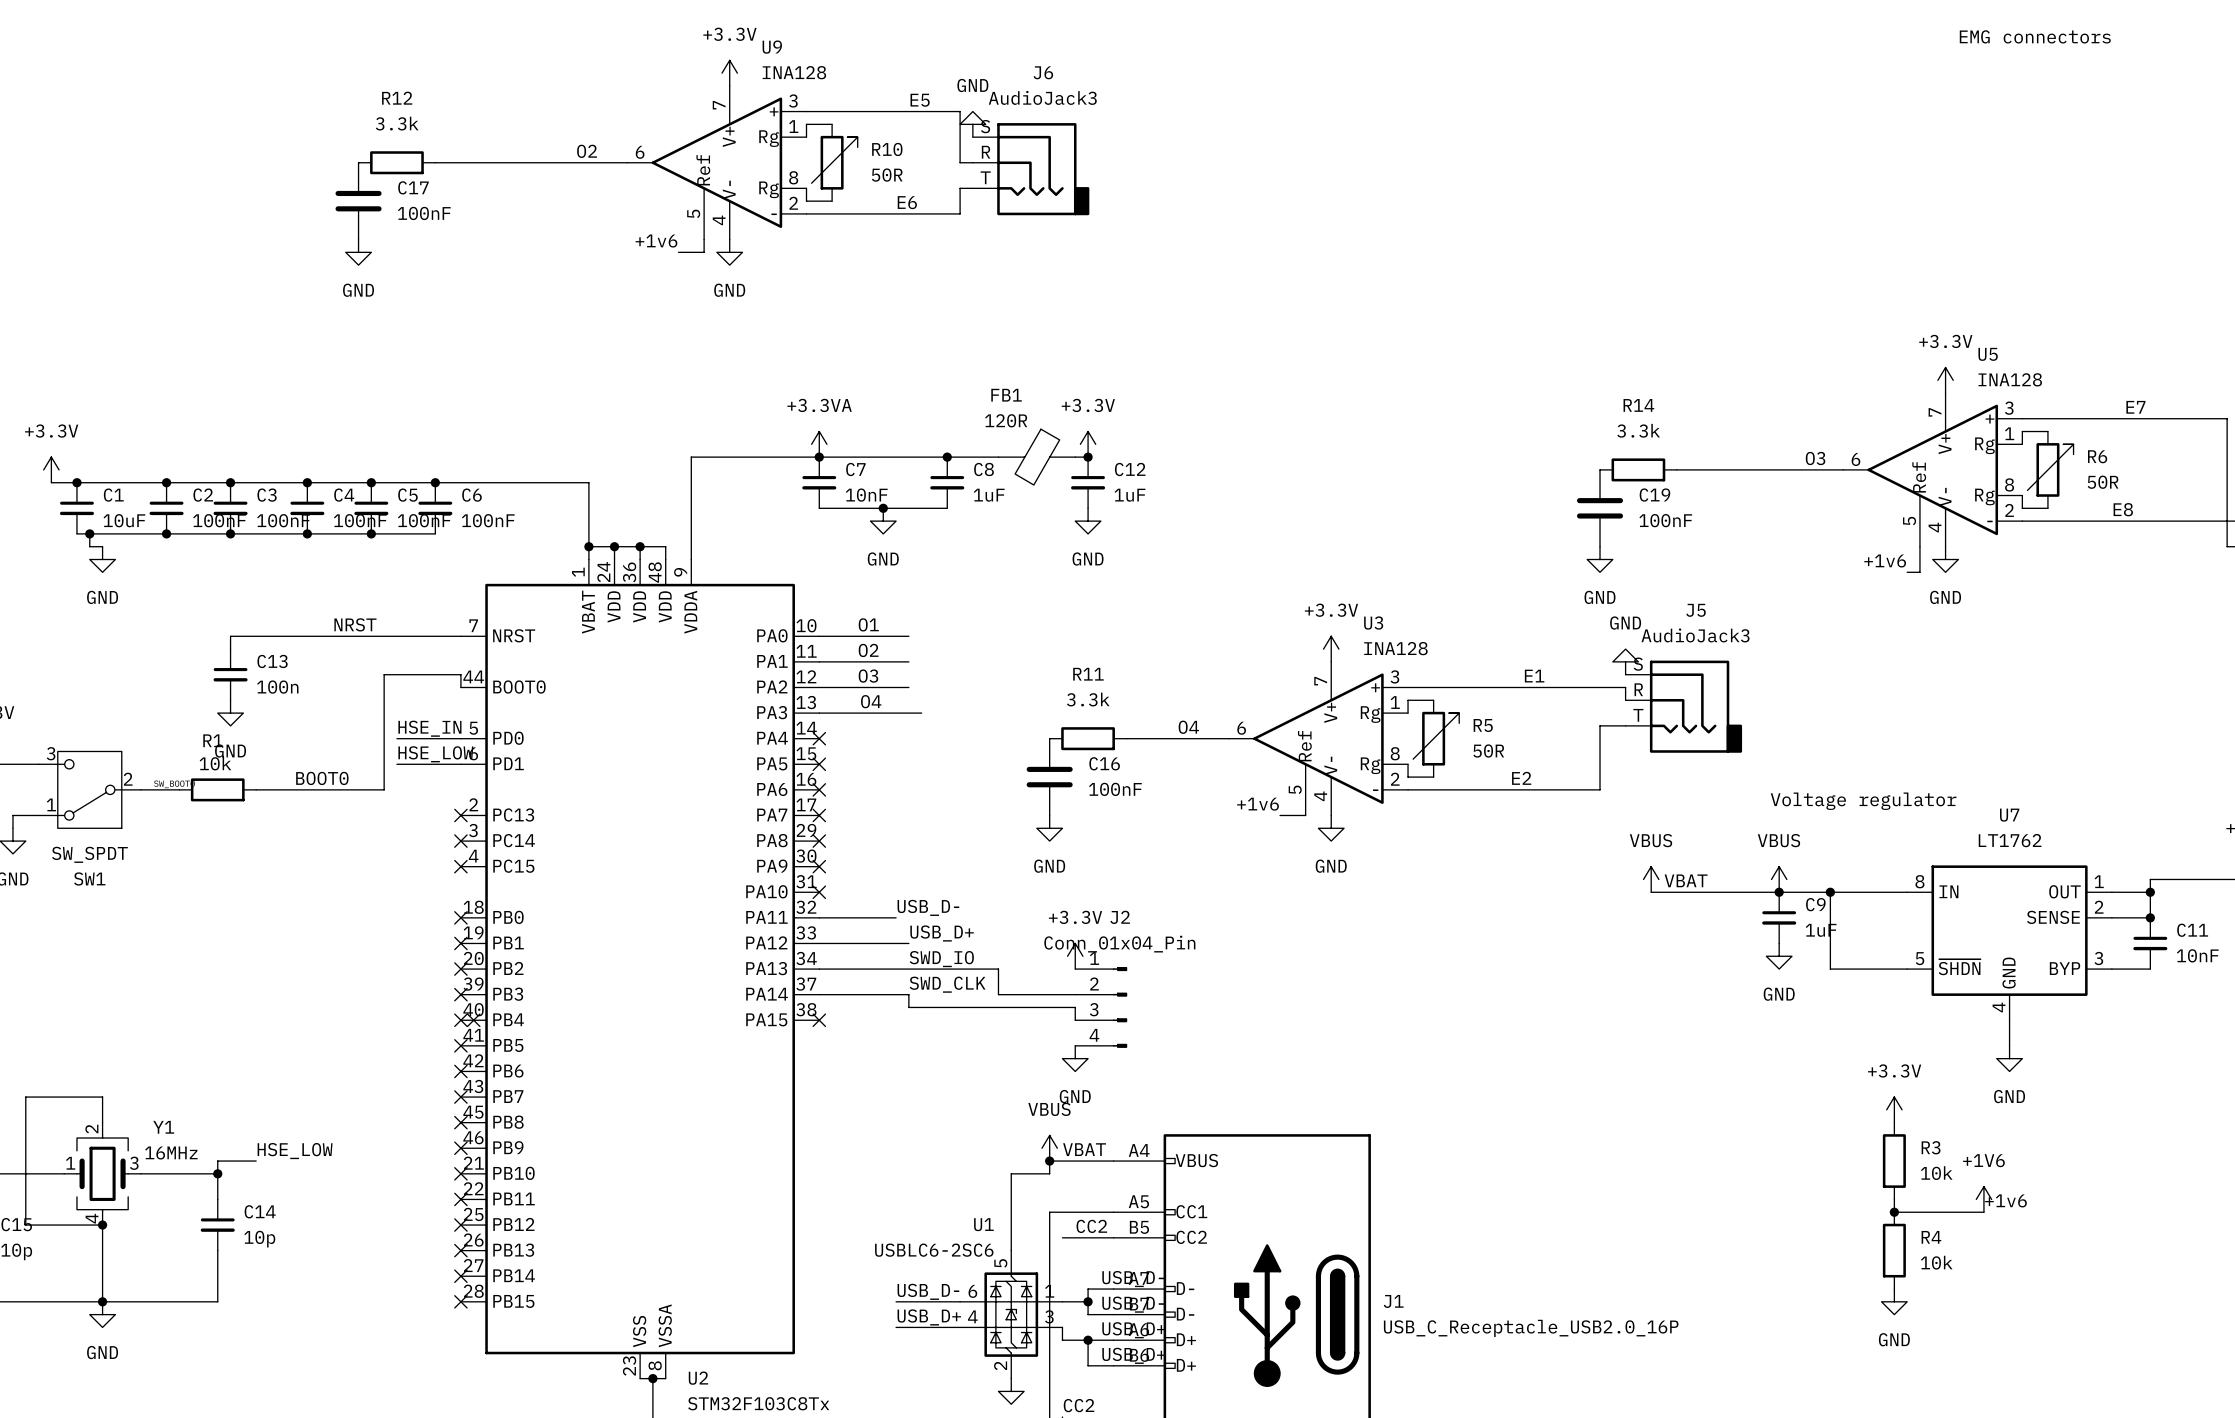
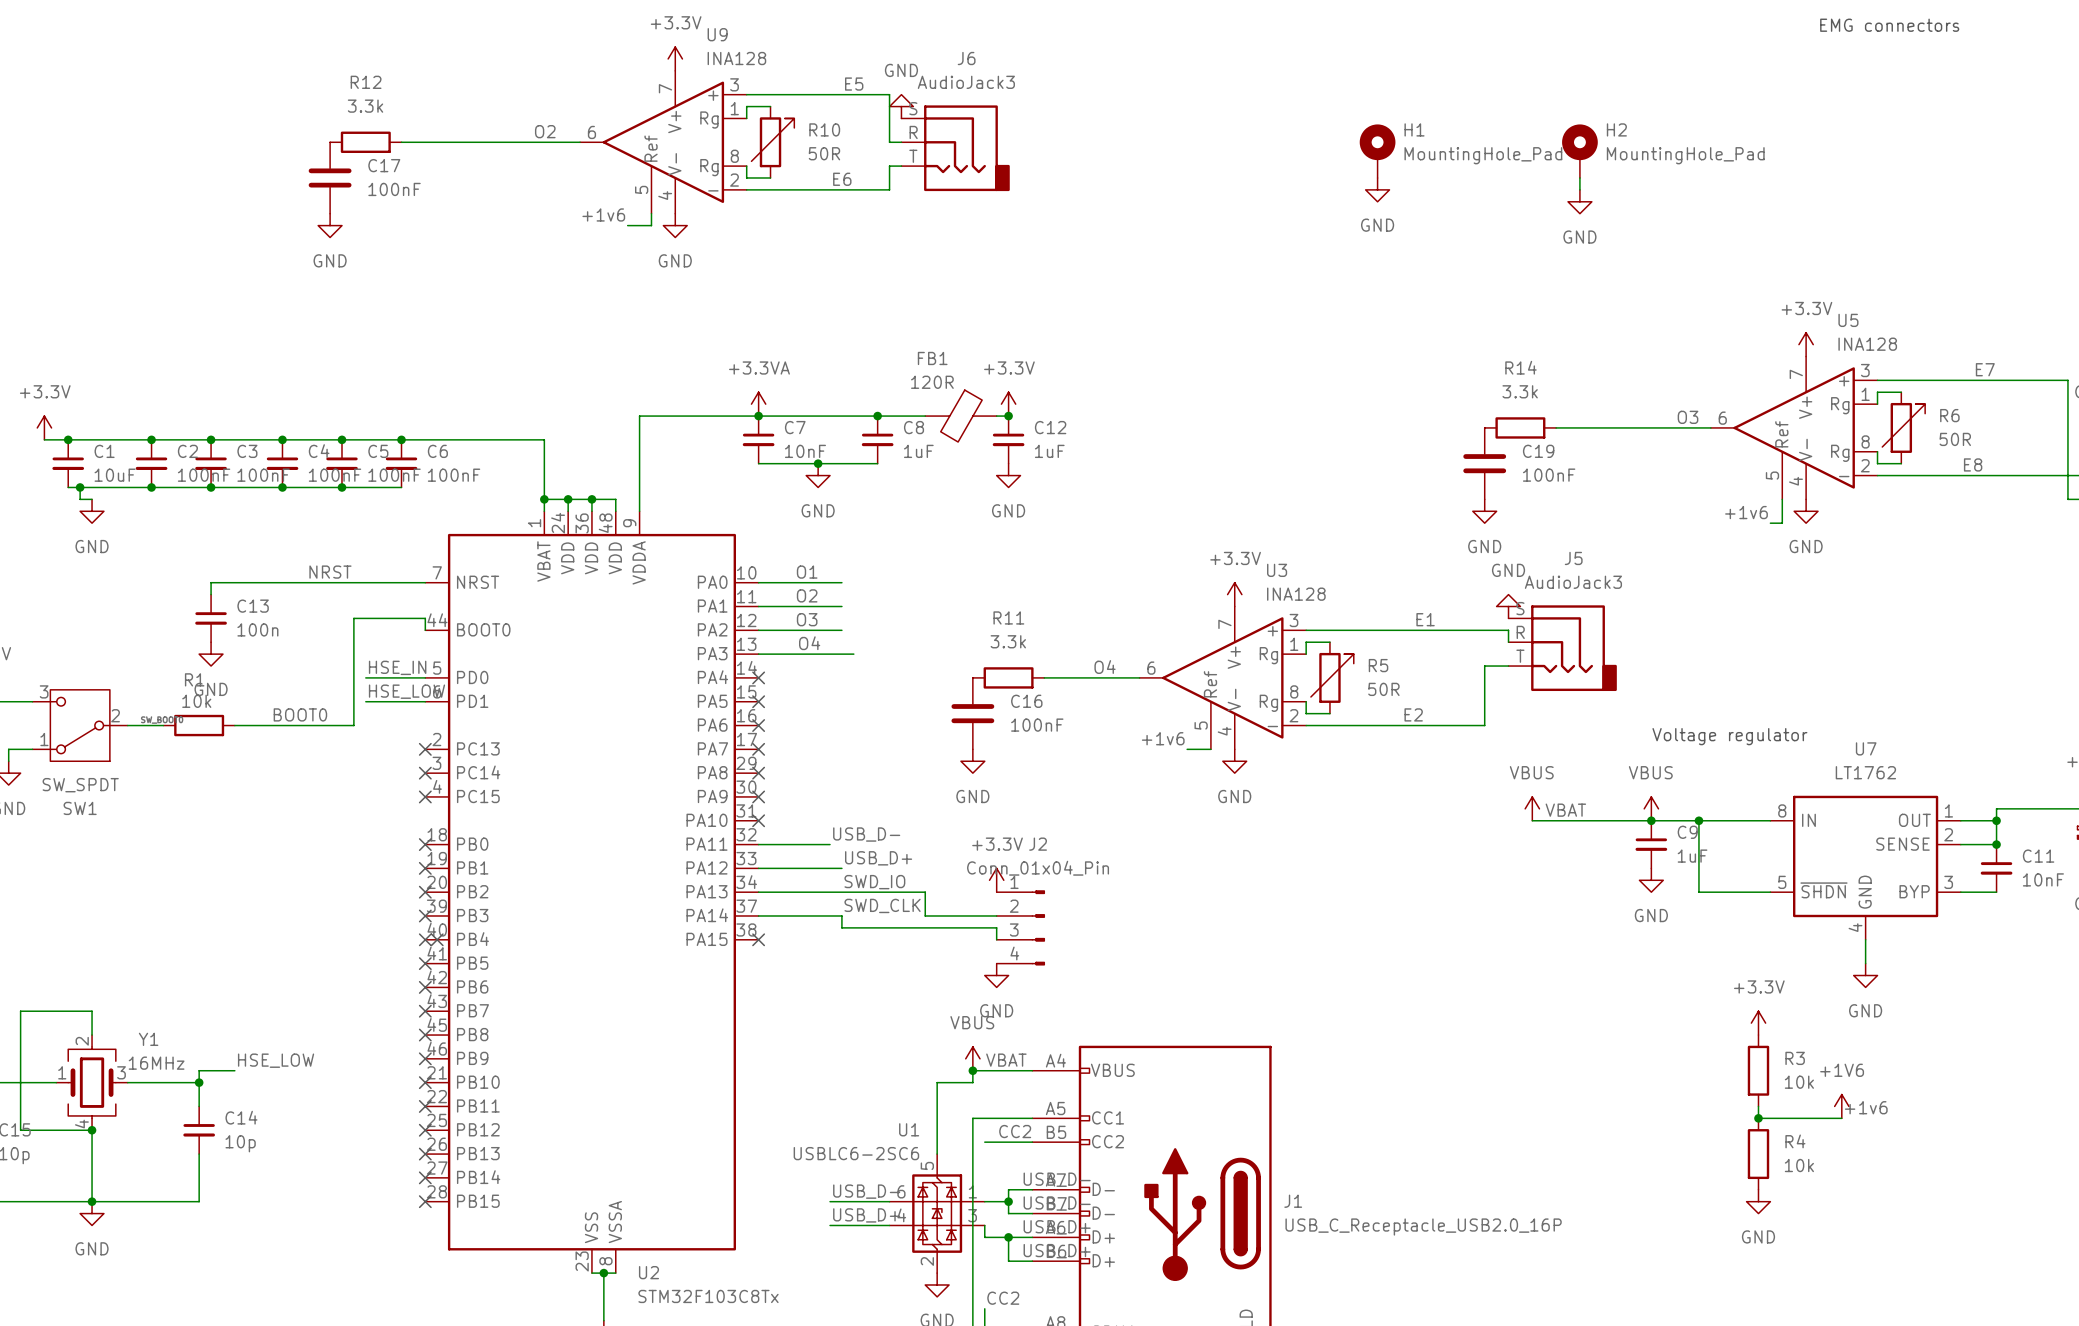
H1: none -> MountingHole_Pad (1377, 151)
H2: none -> MountingHole_Pad (1579, 151)
wire: none -> (1579, 177) (1579, 189)
power symbol: none -> GND (1377, 189)
power symbol: none -> GND (1579, 201)

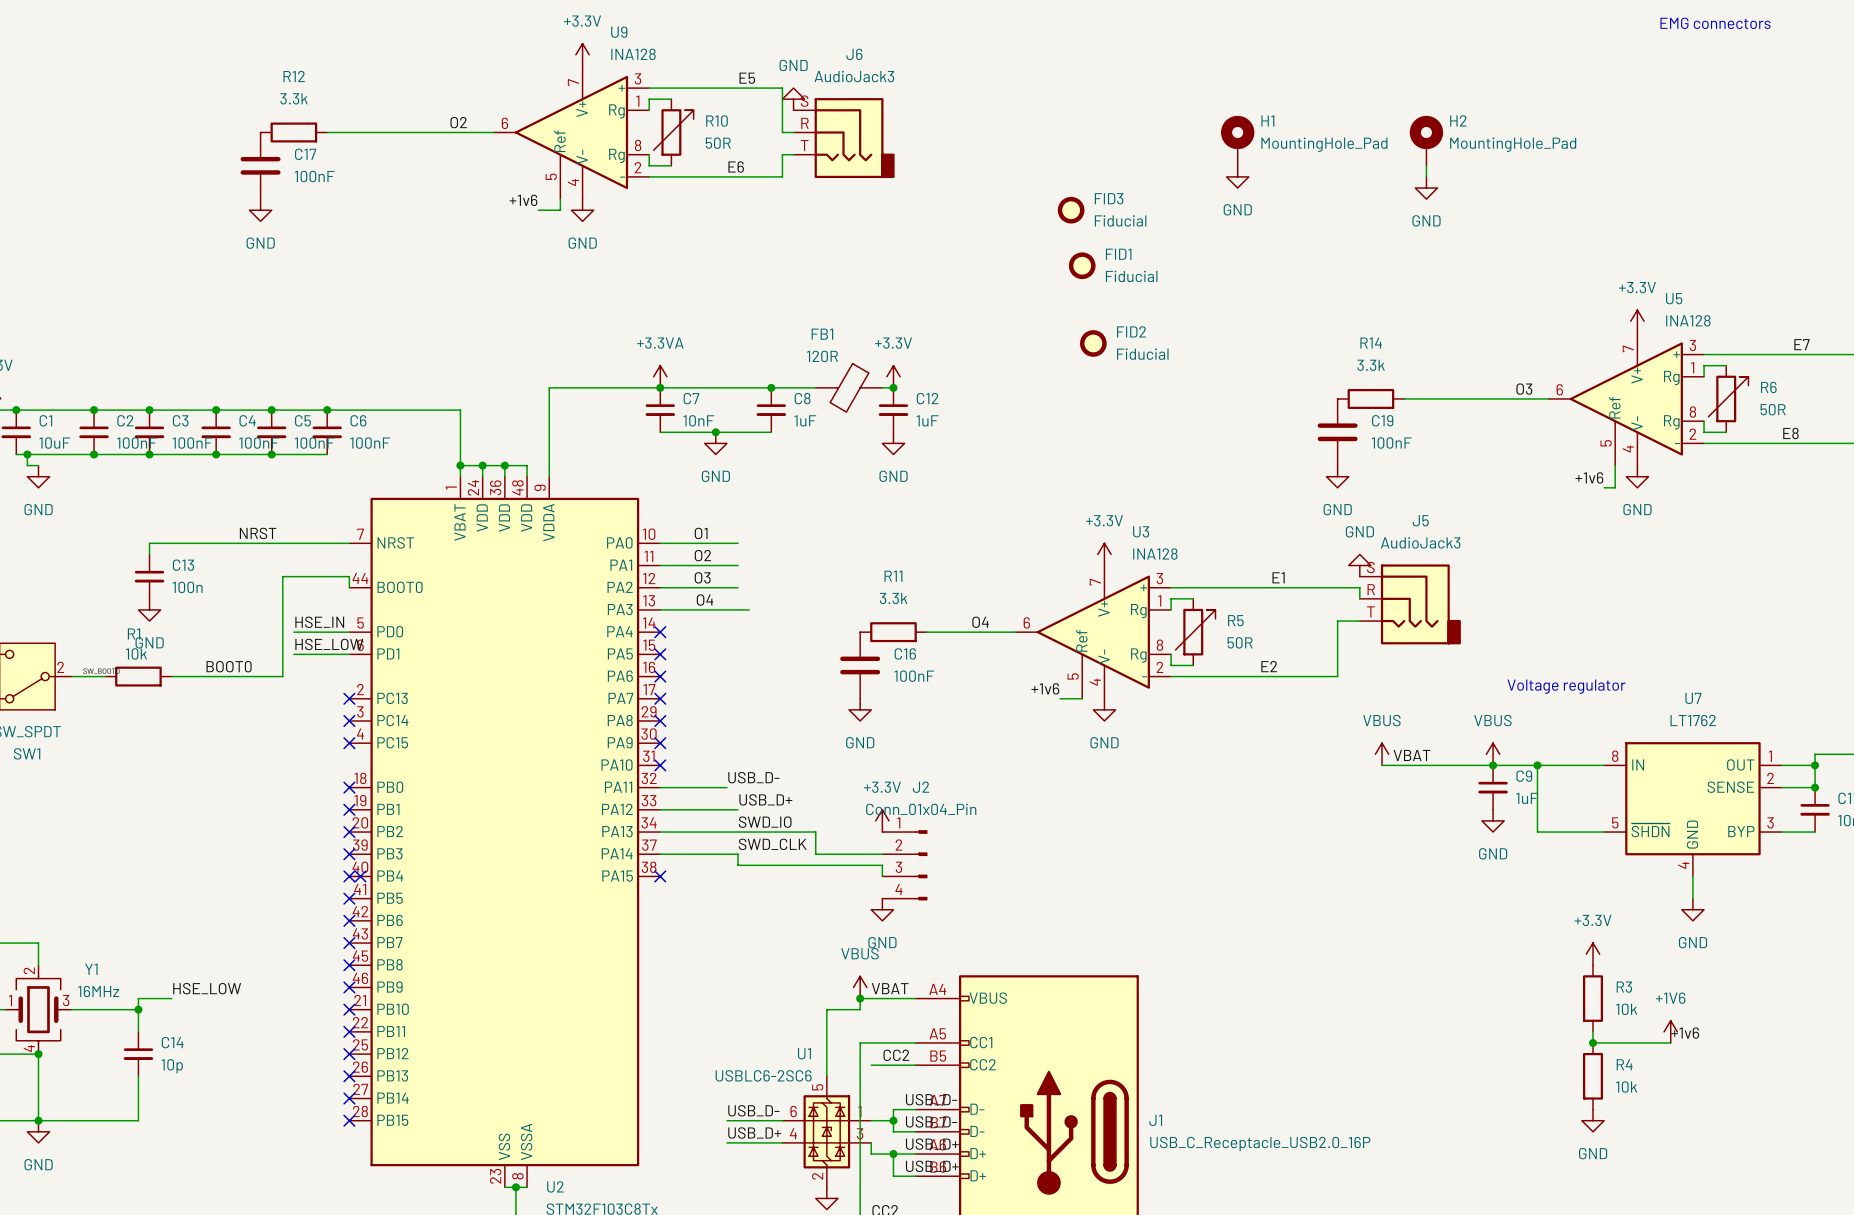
FID3: none -> Fiducial (1071, 210)
FID1: none -> Fiducial (1082, 265)
FID2: none -> Fiducial (1093, 343)

